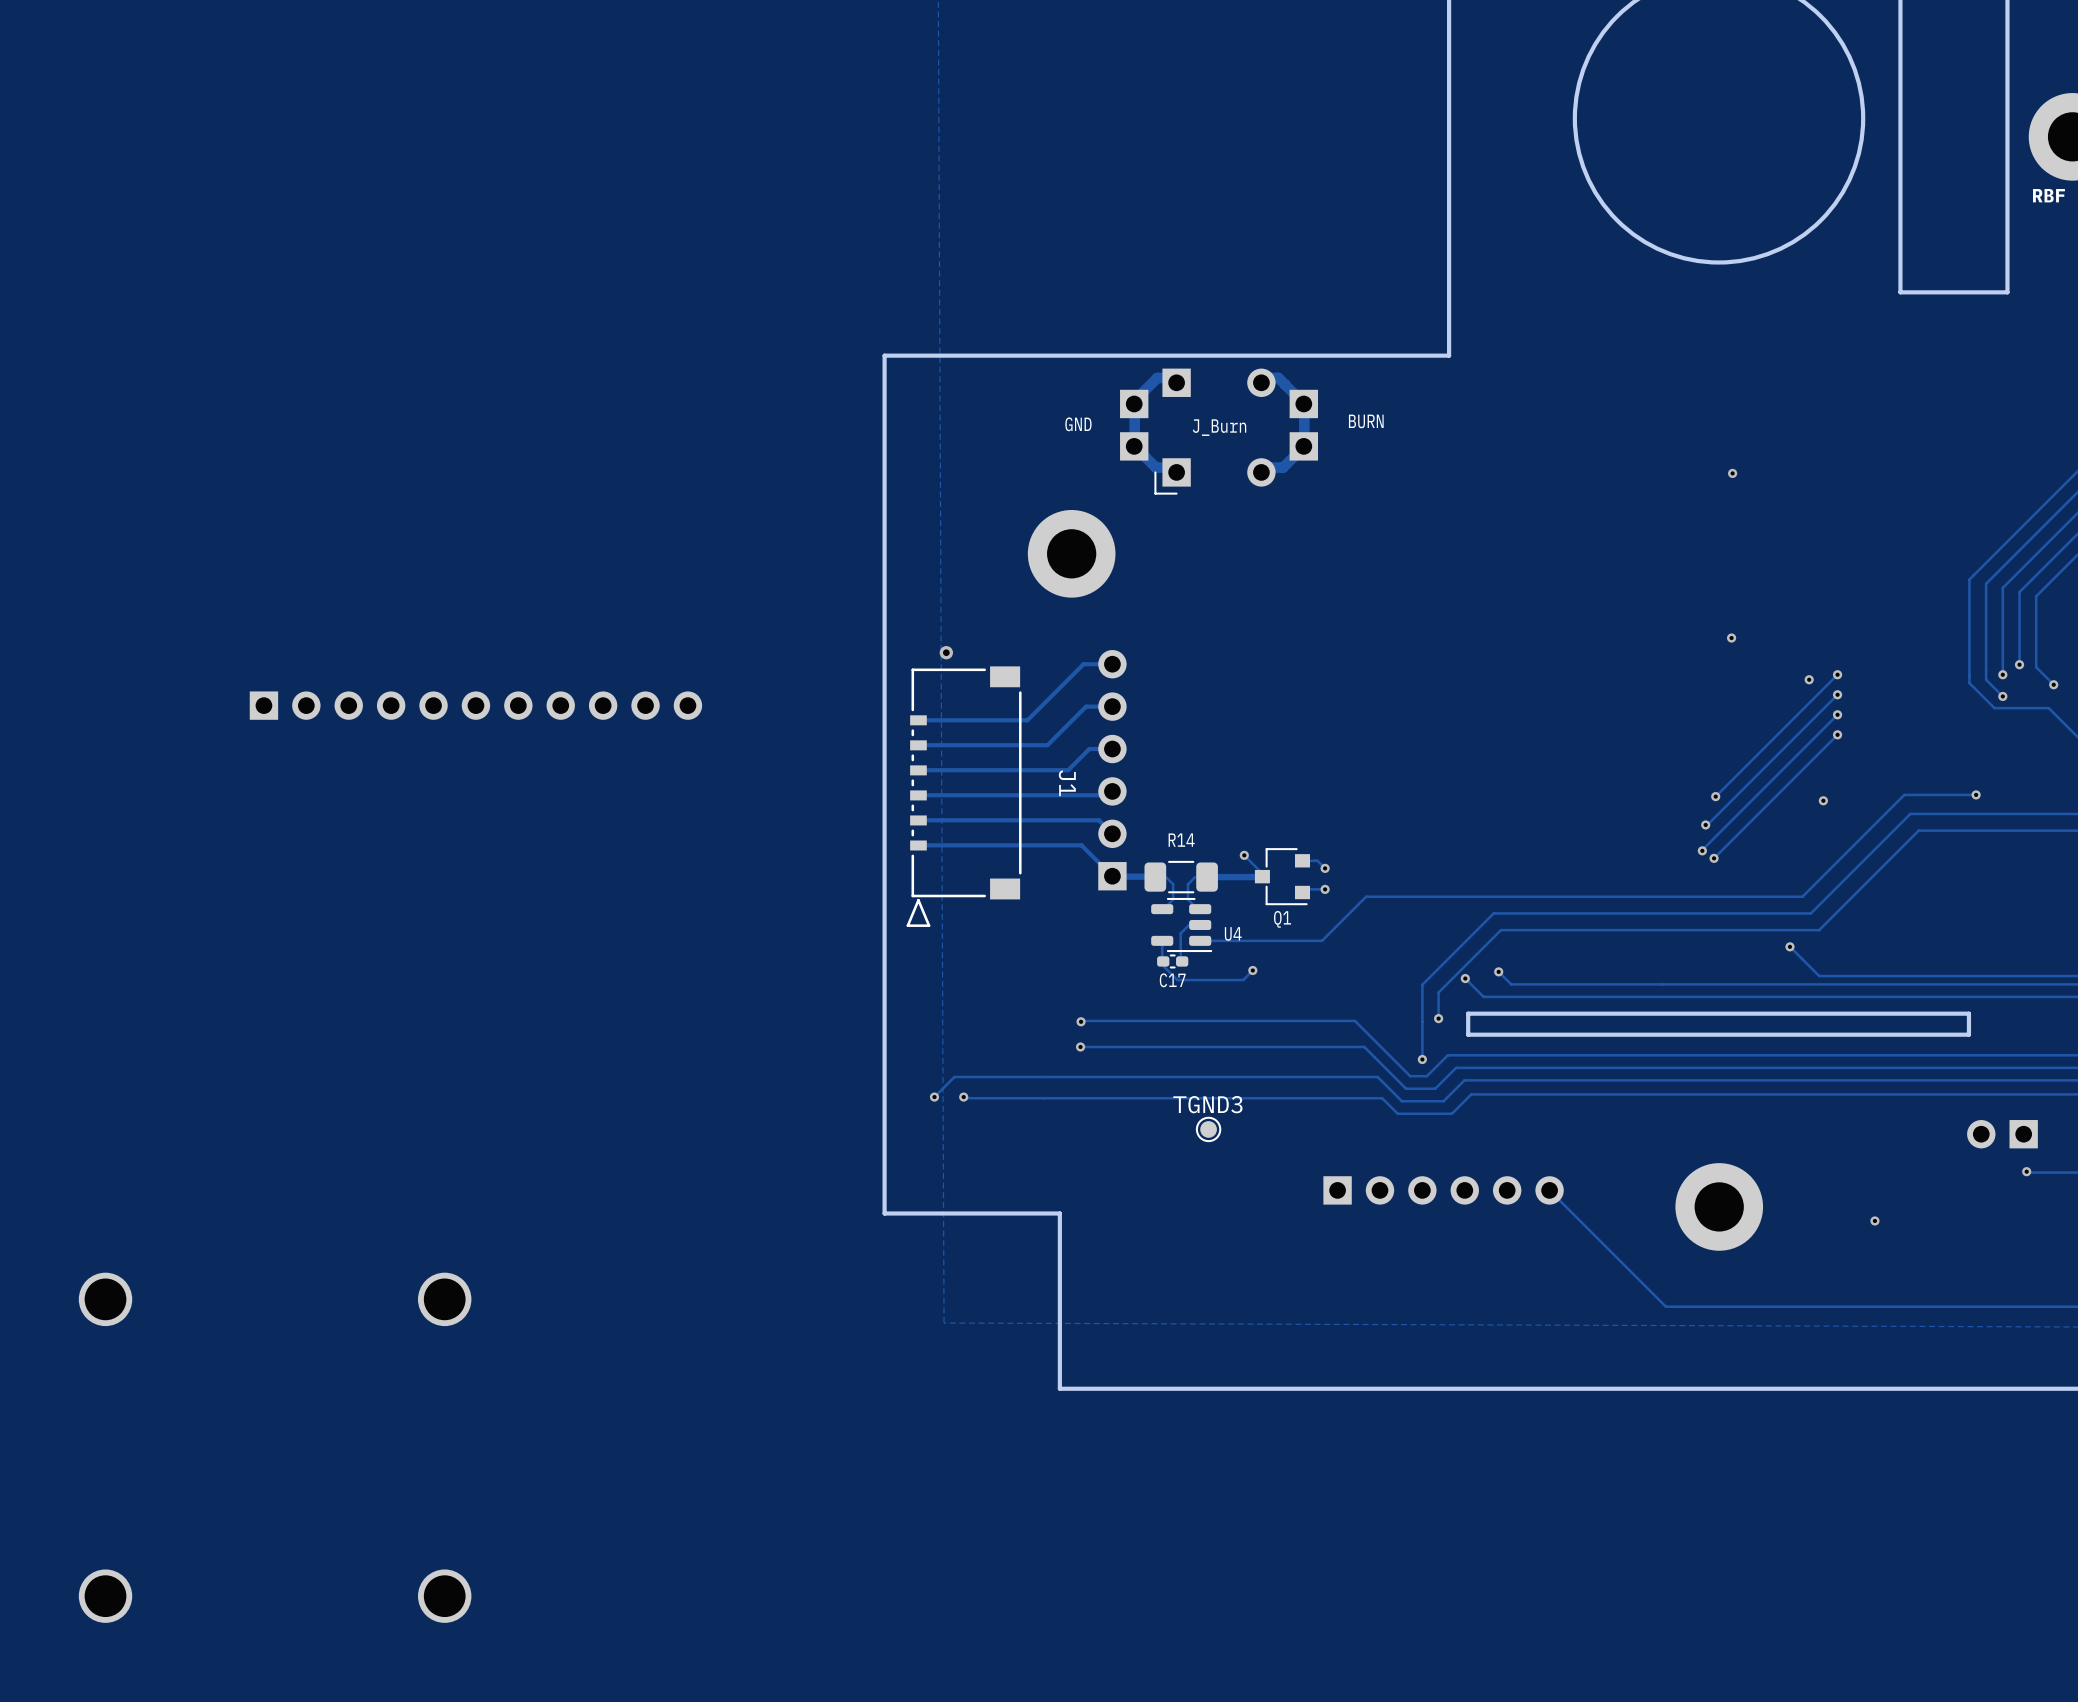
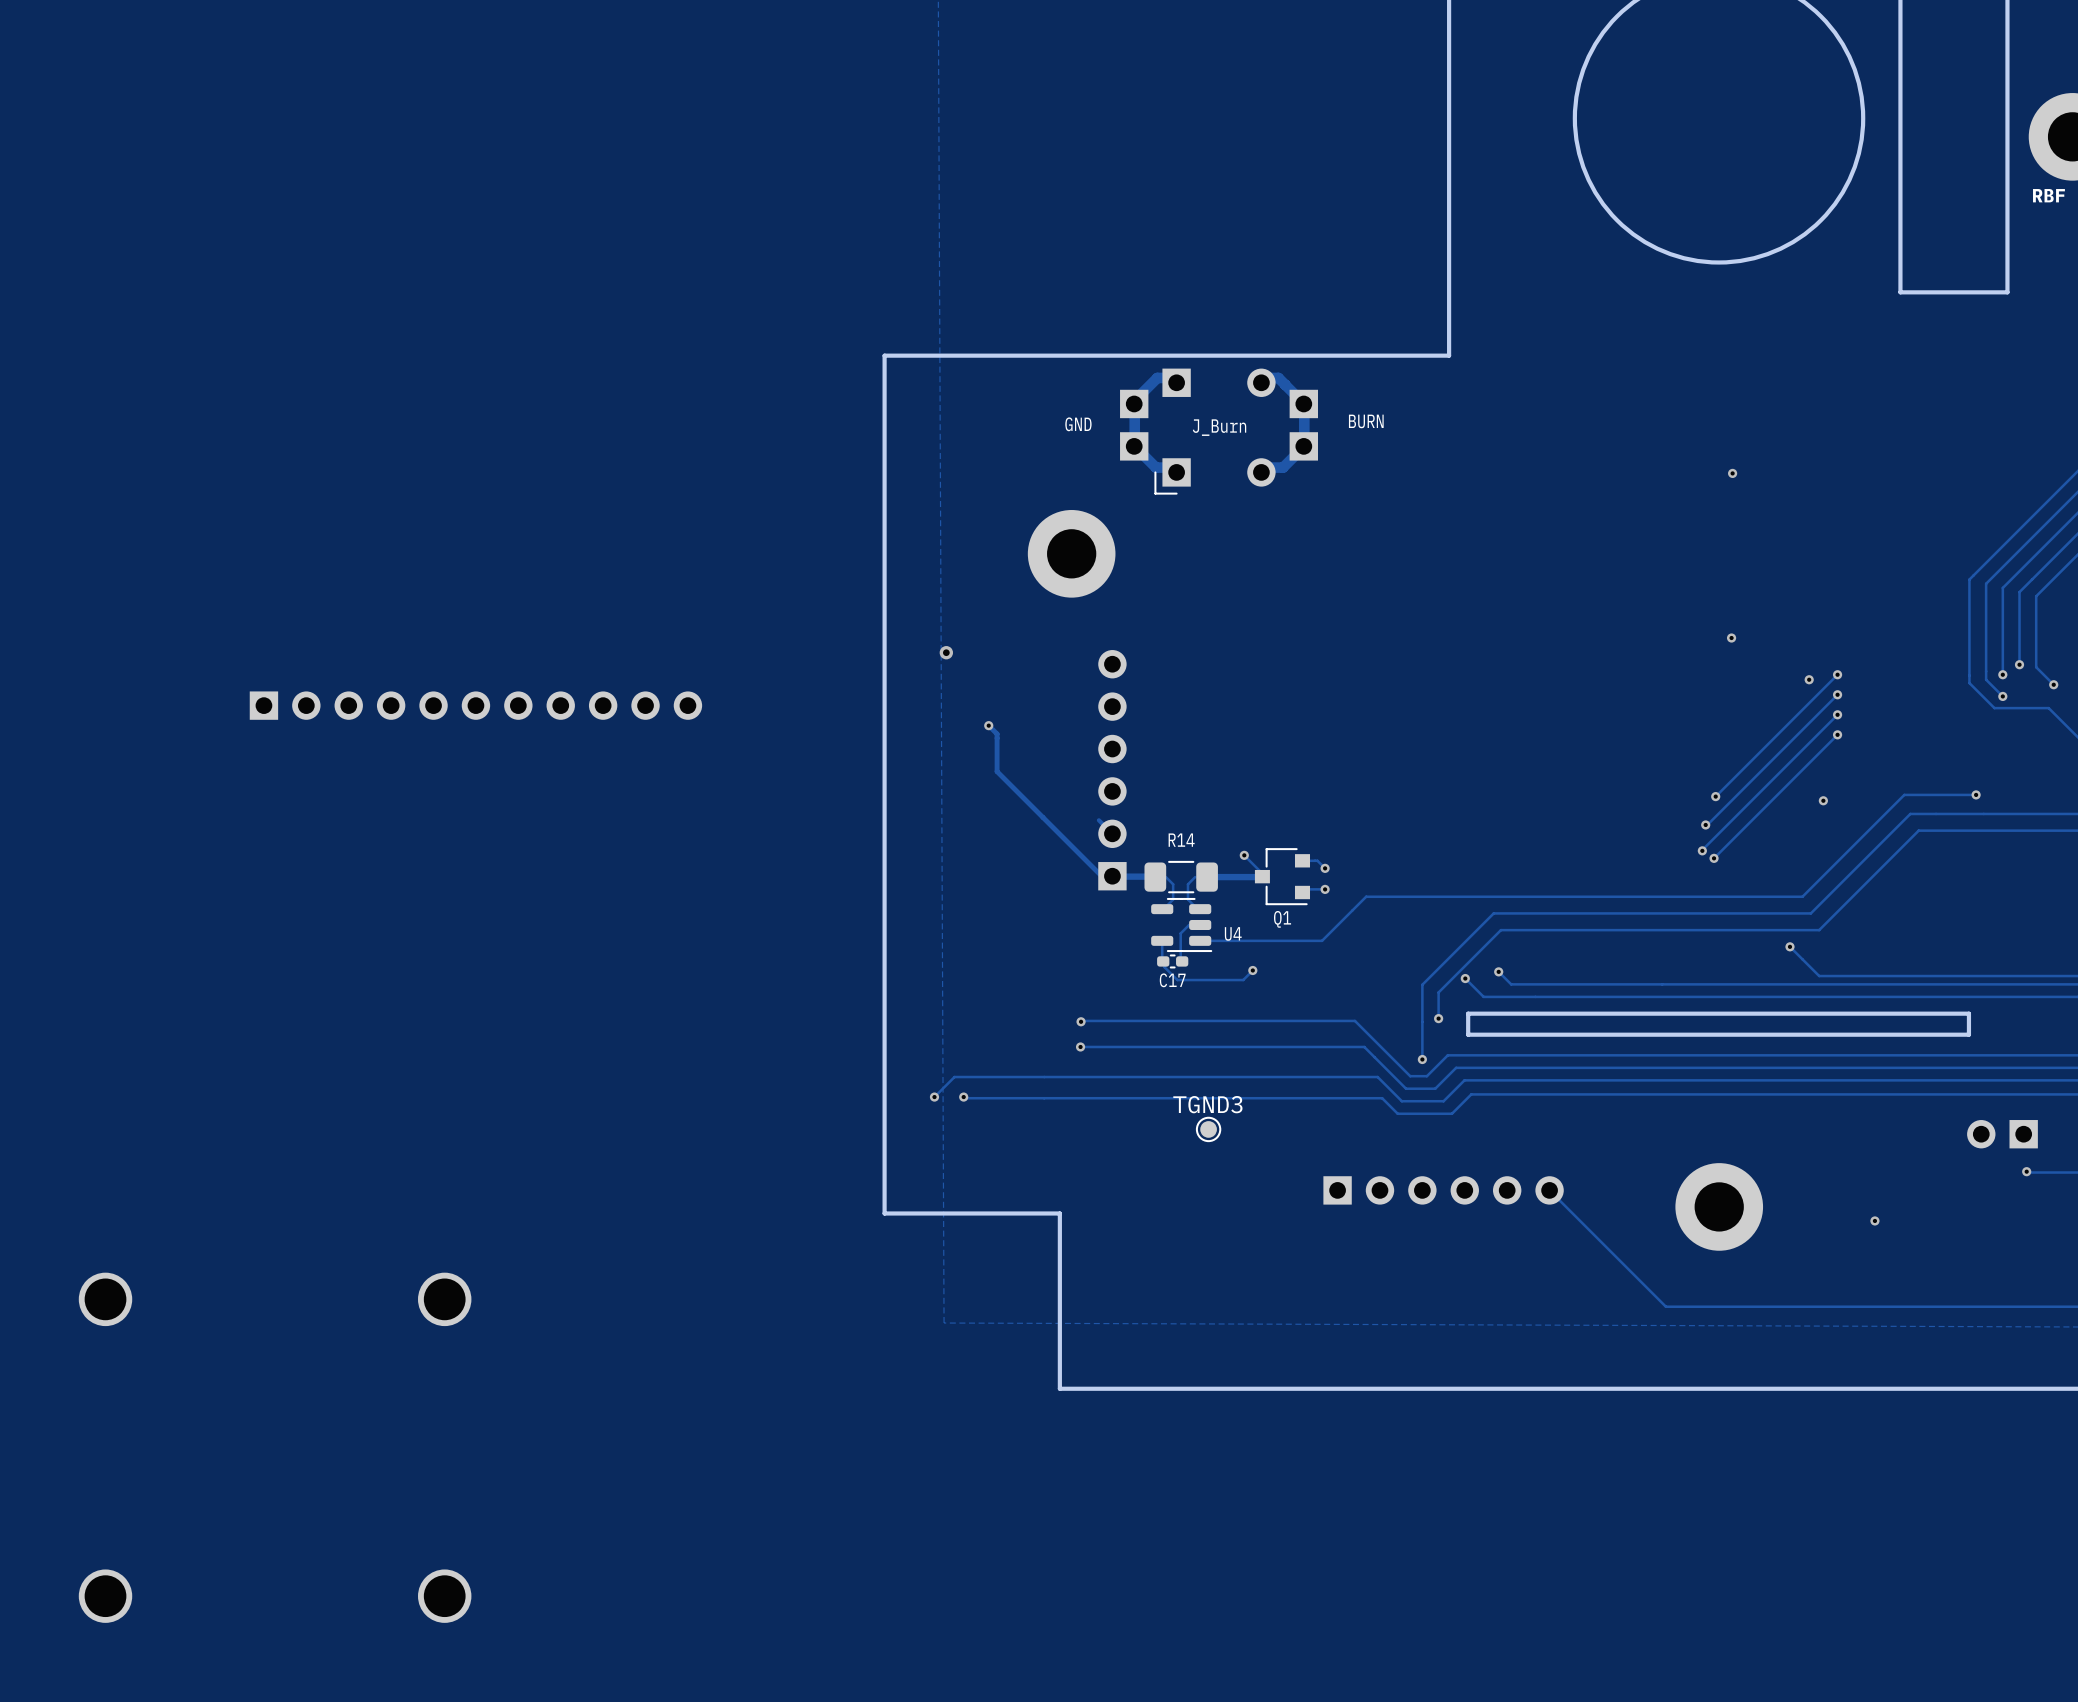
track: (1112, 664) (1083, 664) (1027, 720) (918, 720) -> none
track: (1112, 706) (1086, 706) (1047, 745) (914, 745) -> none
via: none -> (988, 725)
track: (1112, 749) (1089, 749) (1068, 770) (914, 770) -> none
track: (1108, 795) (914, 795) -> none
J1: (964, 796) -> none
track: (1098, 820) (914, 820) -> none
track: (914, 845) (1081, 845) (1112, 876) -> (988, 725) (997, 733) (997, 771) (1101, 876) (1112, 876)

